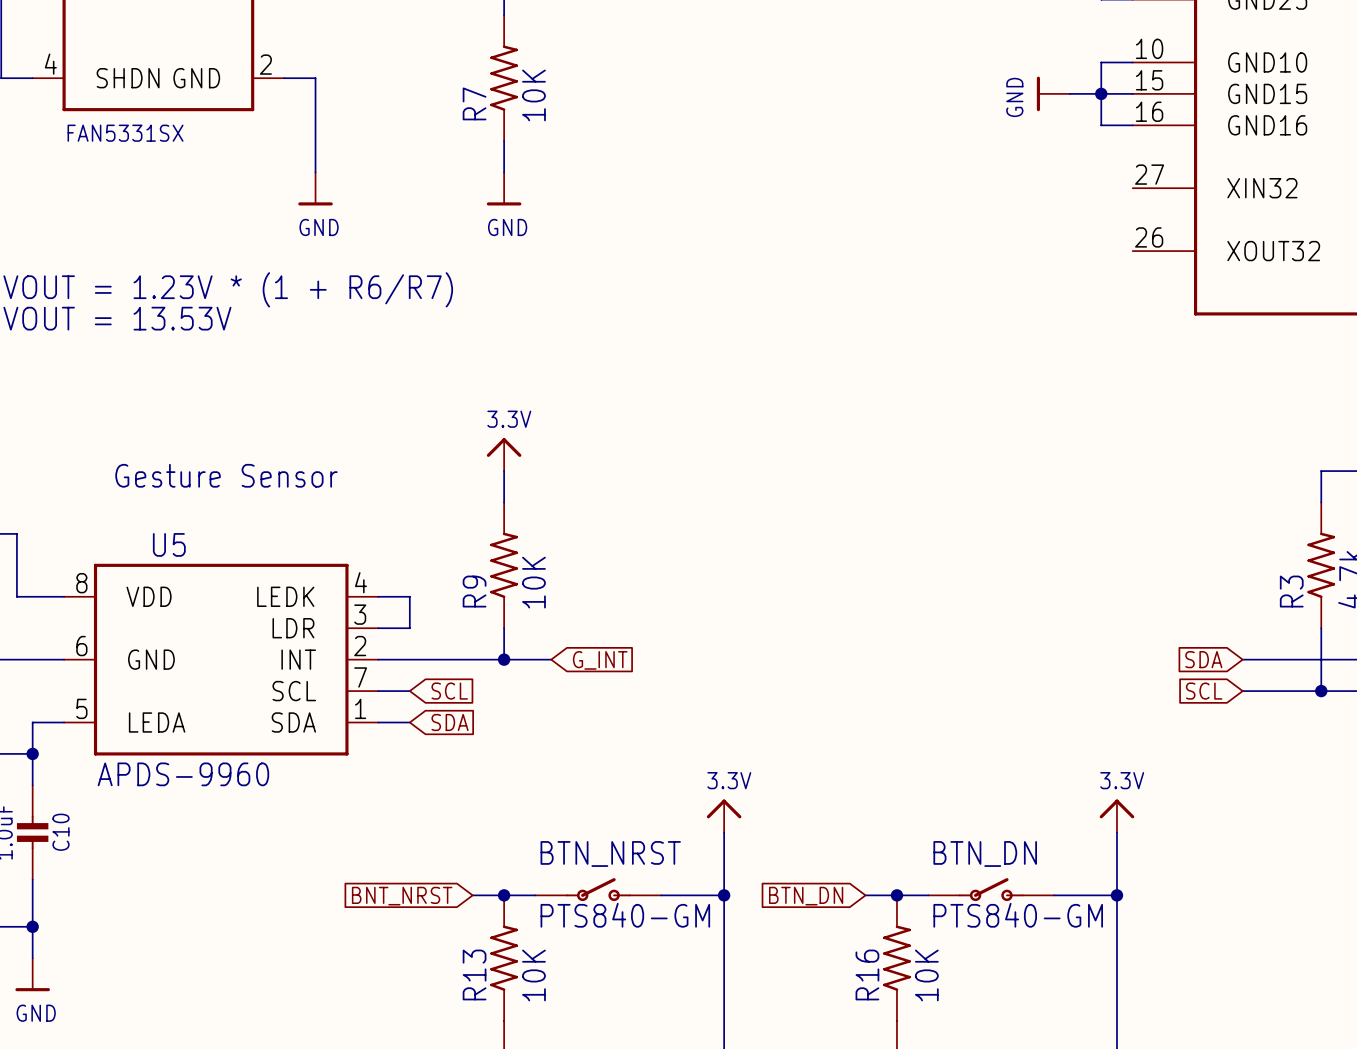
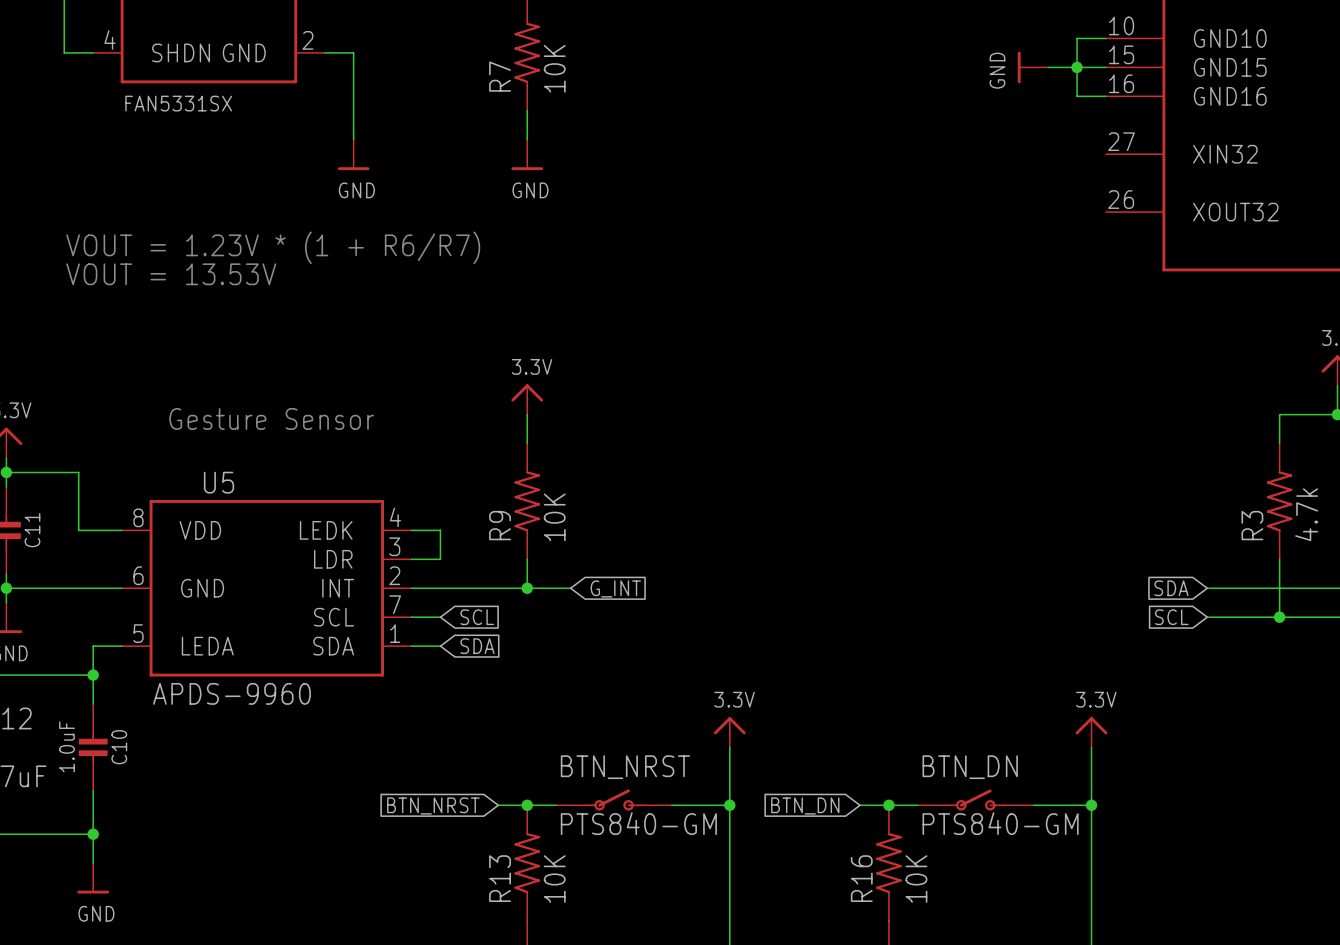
global label: BNT_NRST (402, 896) -> BTN_NRST (433, 805)

